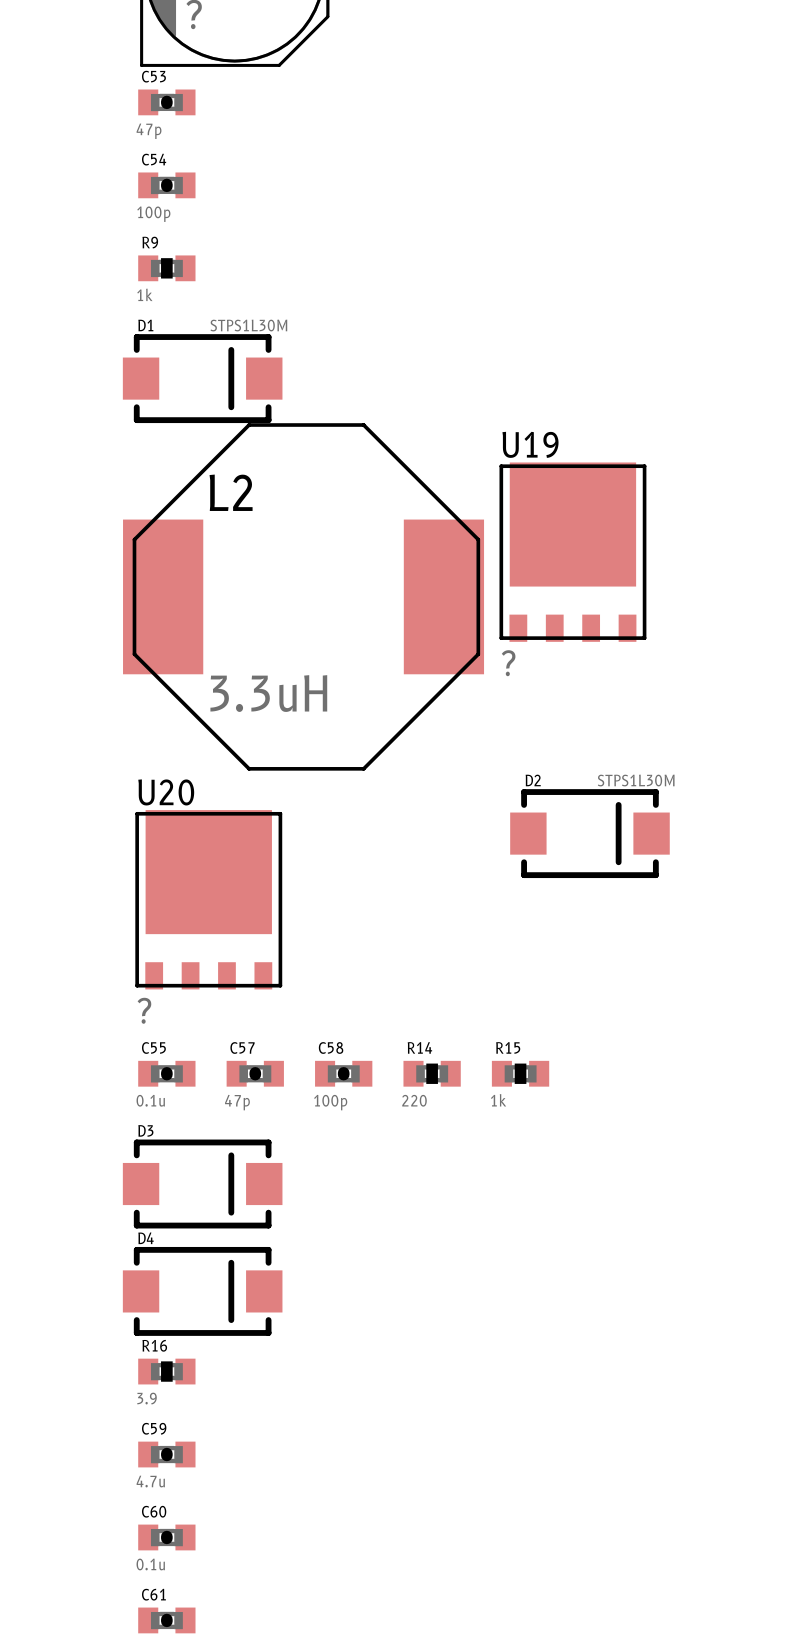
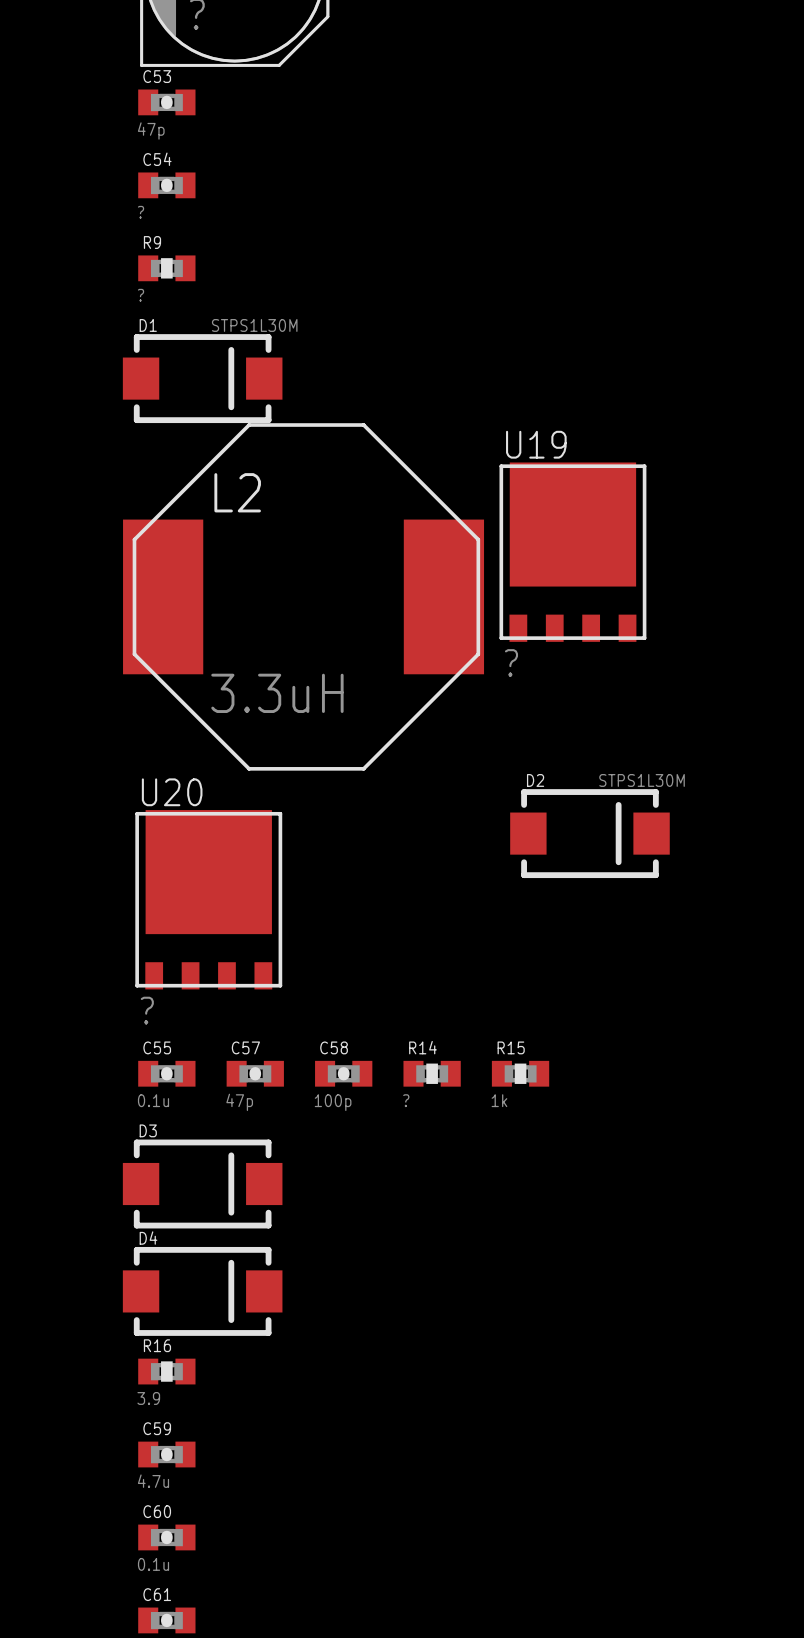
C54 value: 100p (153, 214) -> ? (141, 212)
R9 value: 1k (144, 294) -> ? (141, 295)
R14 value: 220 (414, 1100) -> ? (406, 1100)

